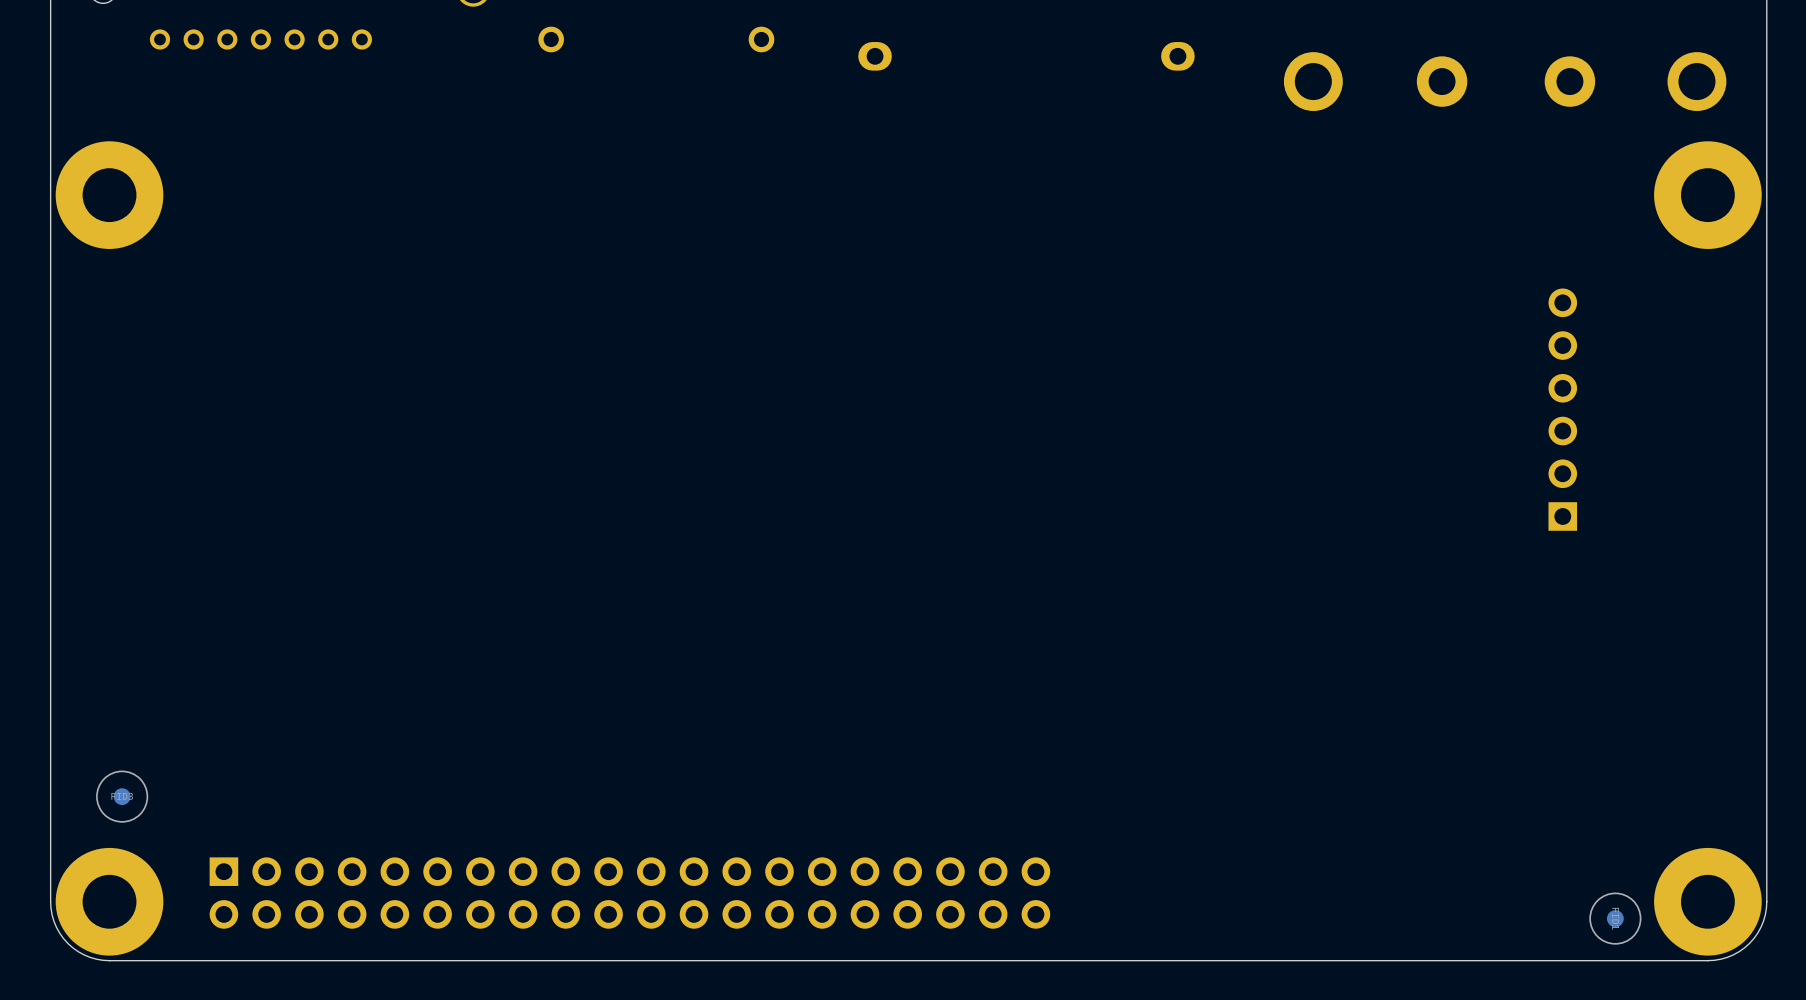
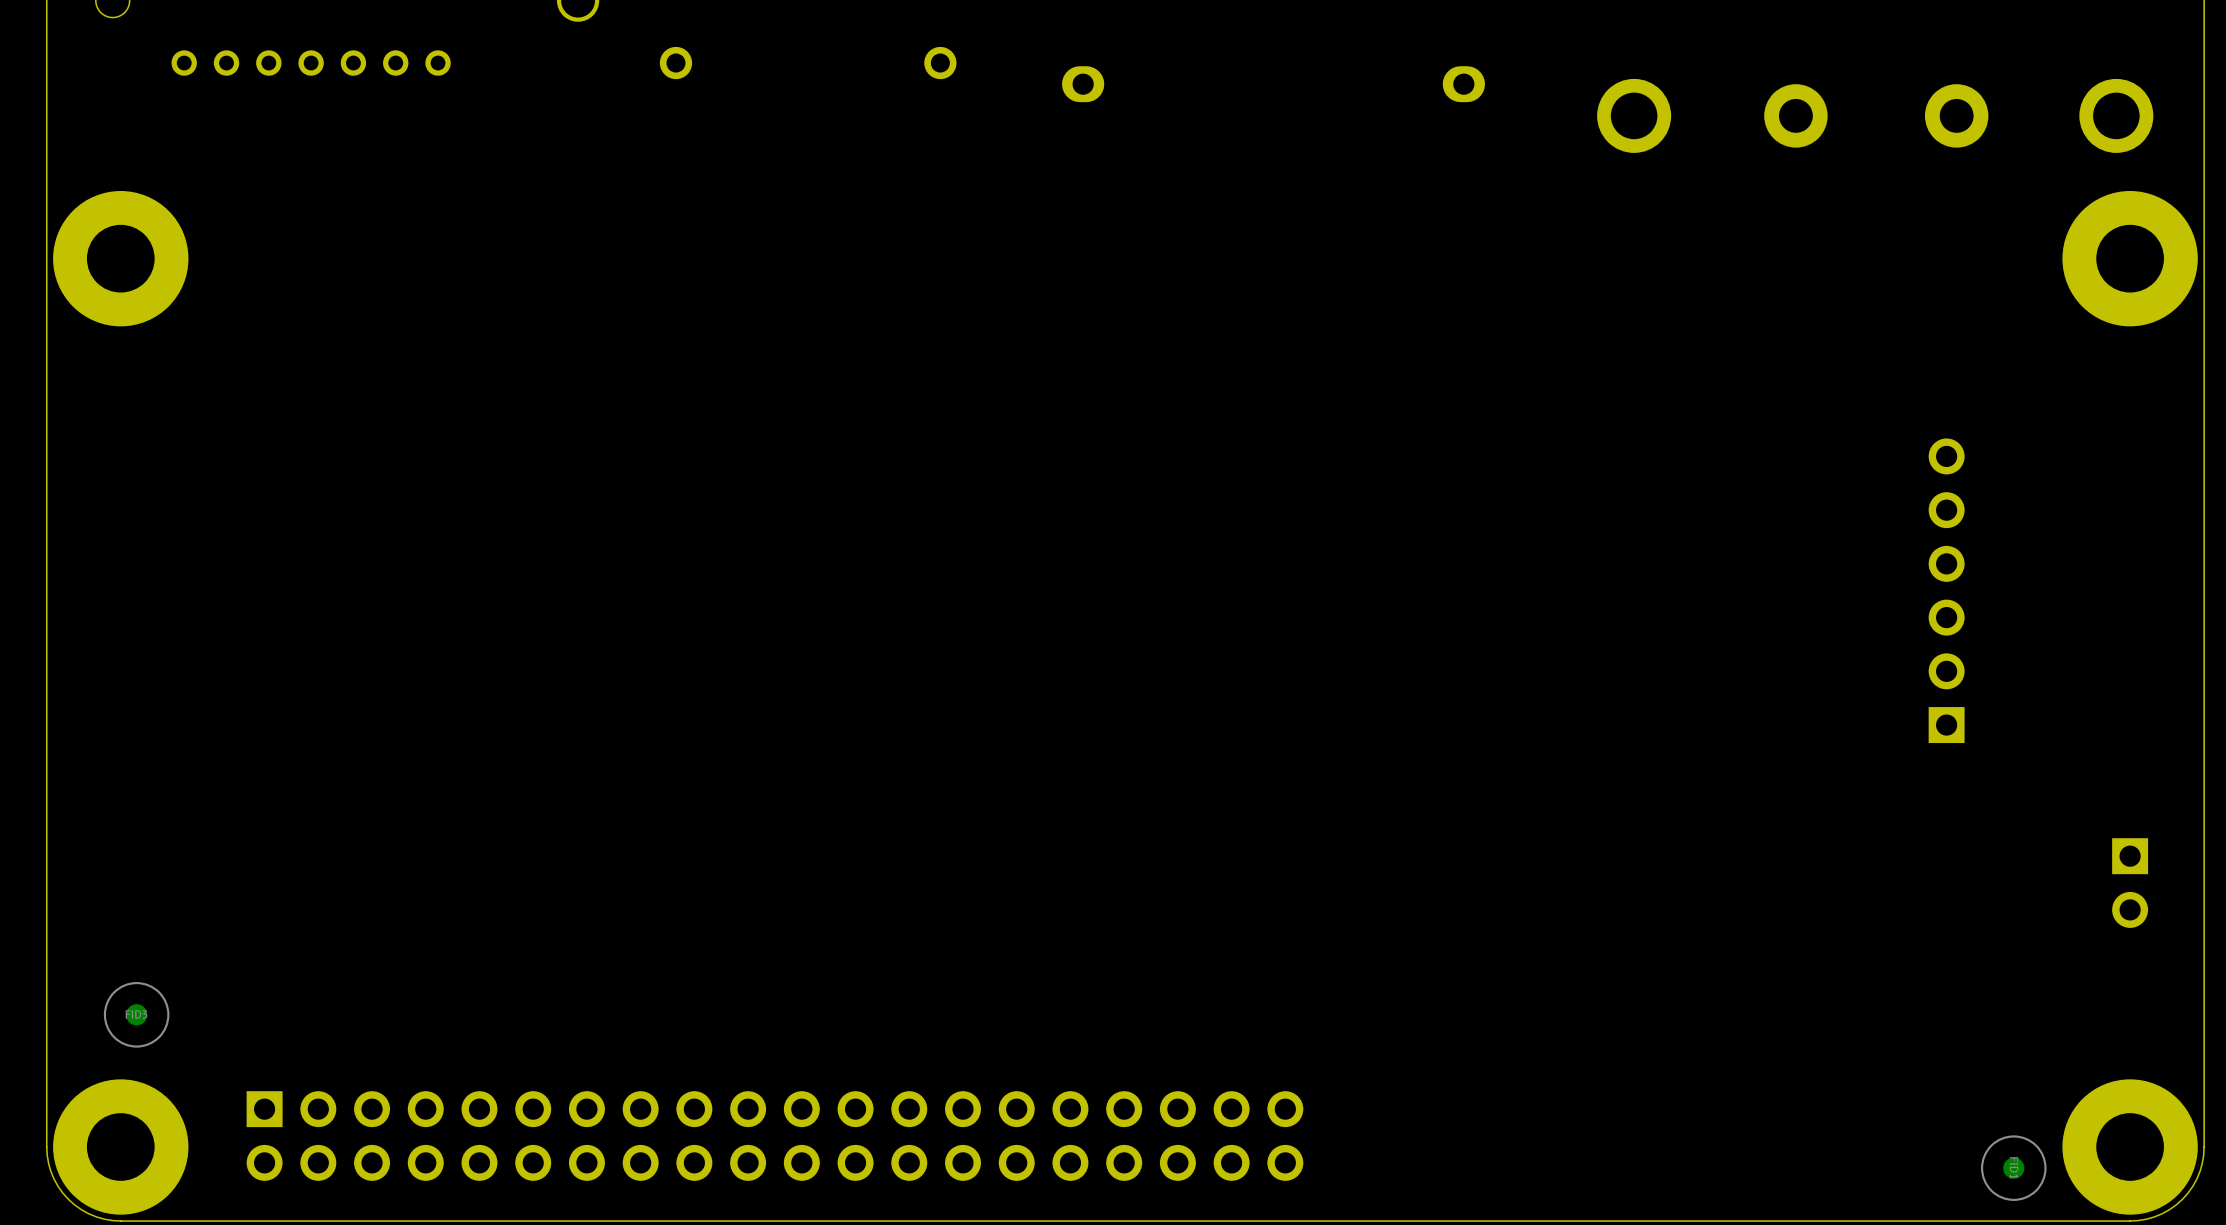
part position: (1562, 409) -> (1946, 590)
part: none -> (2130, 883)

